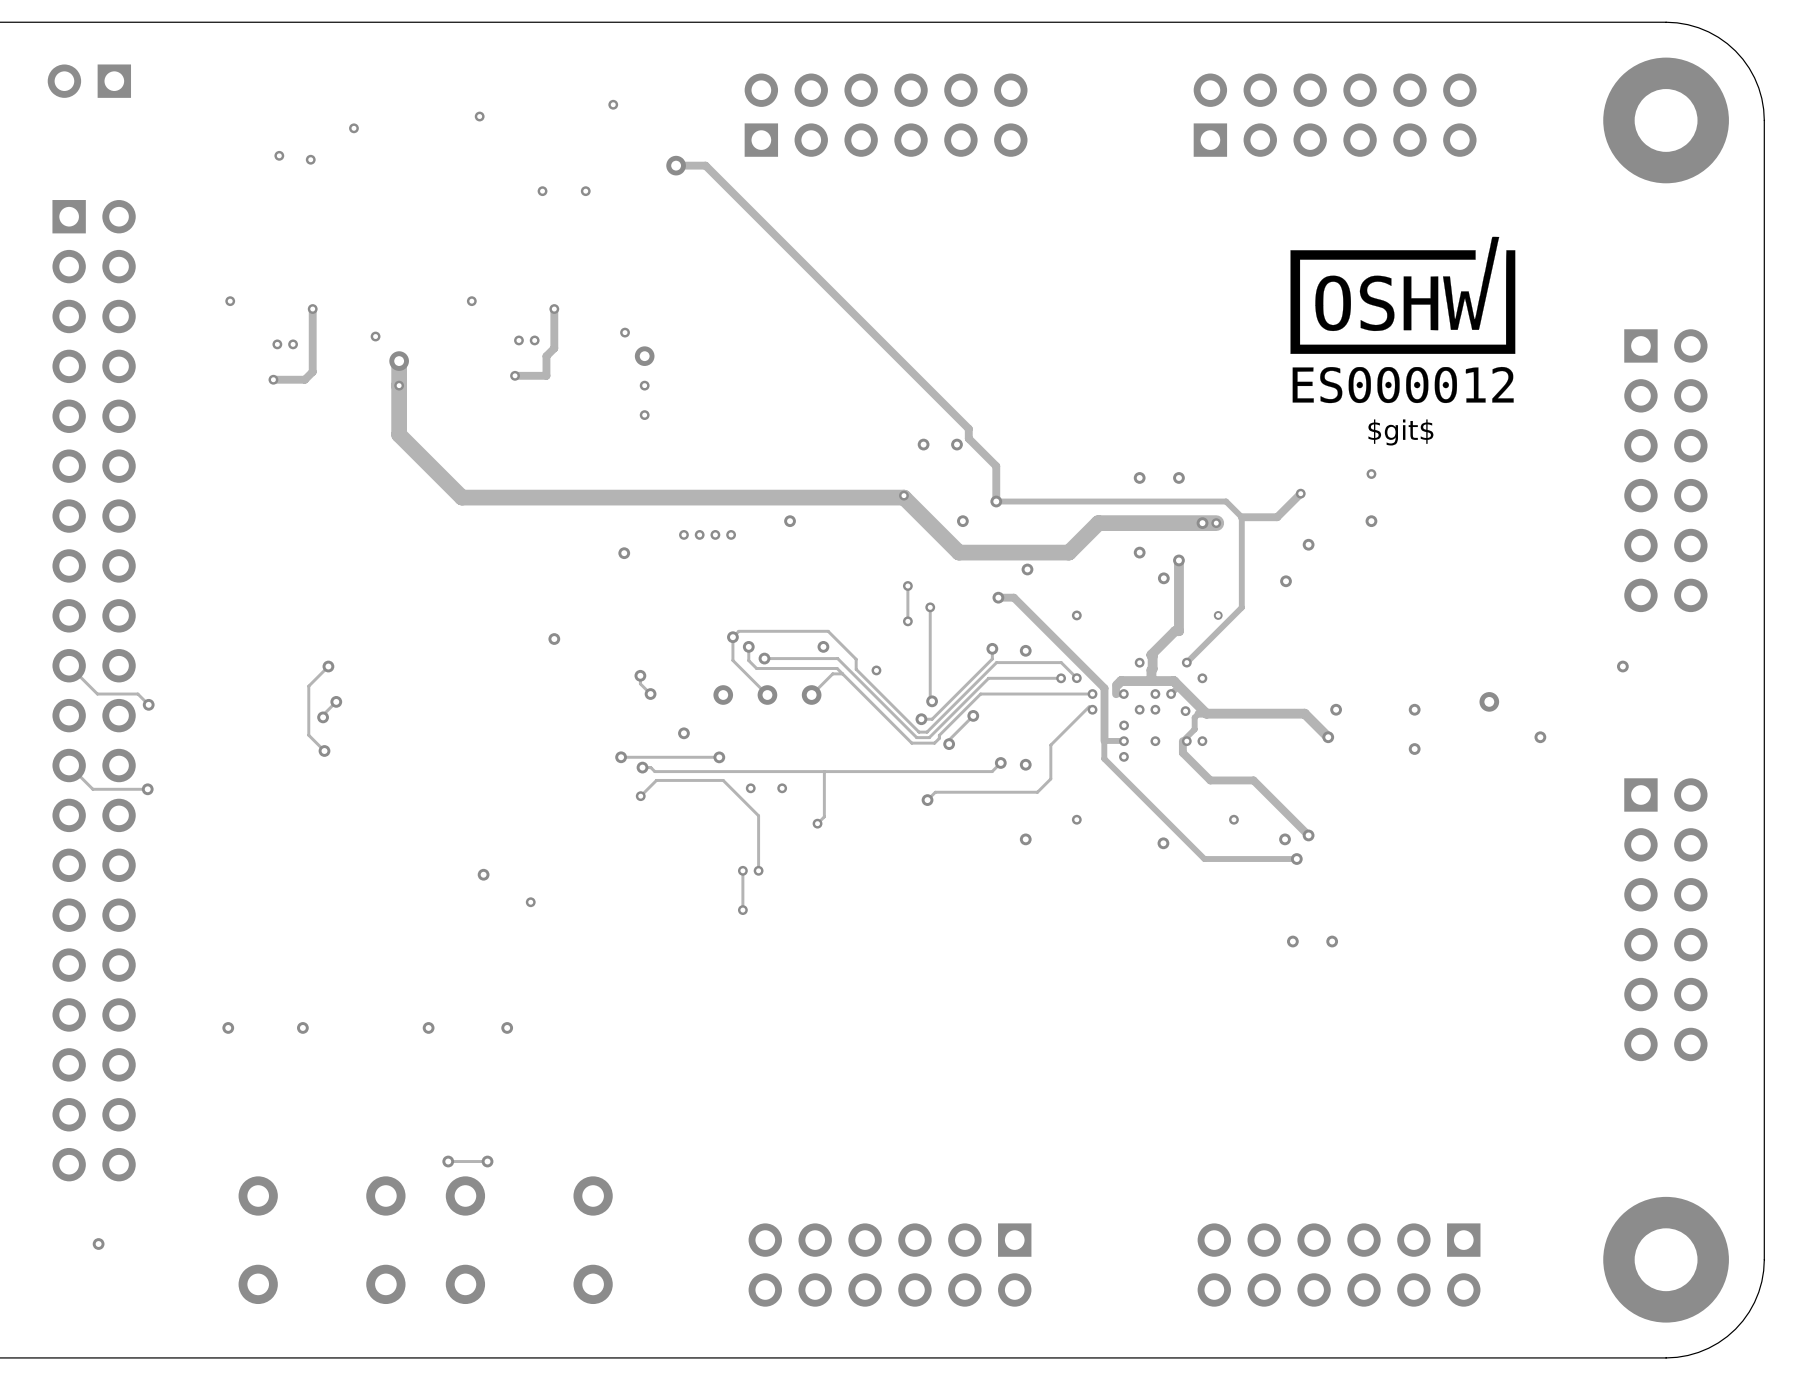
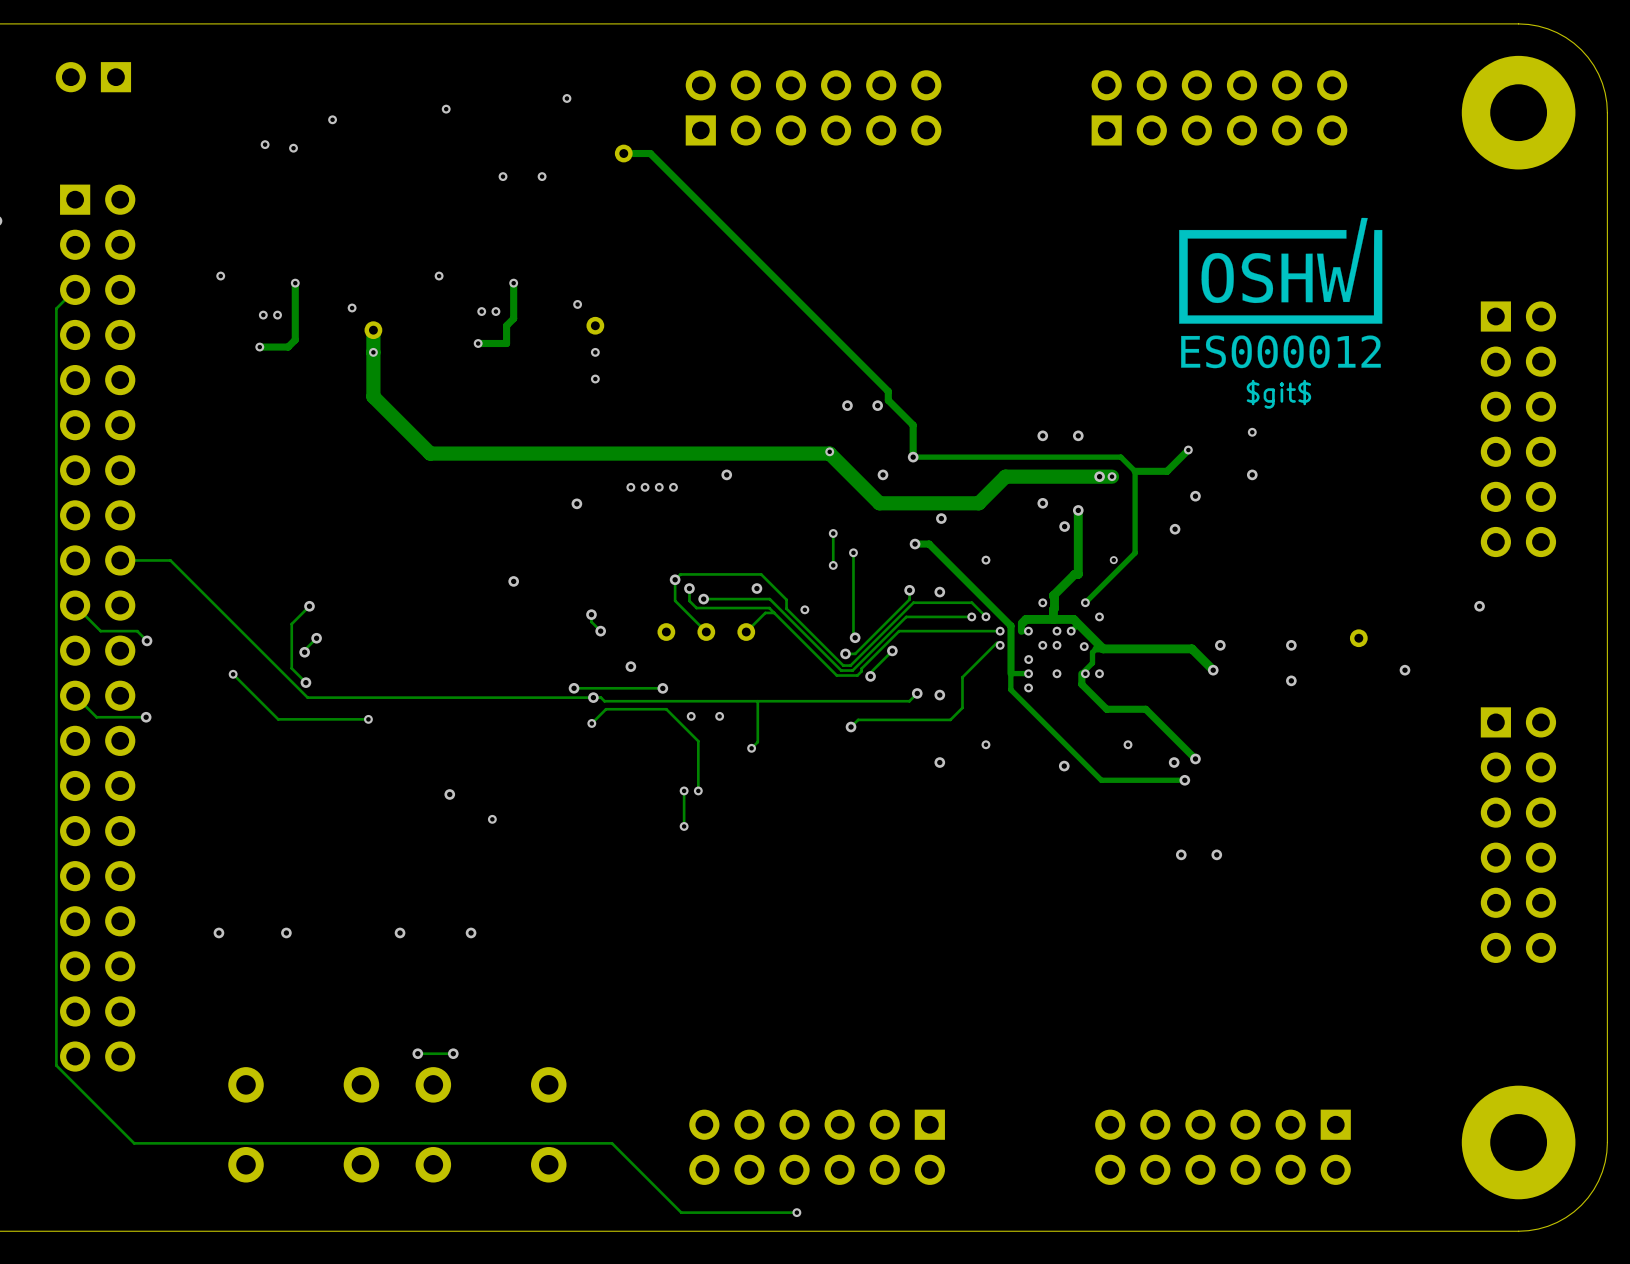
track: none -> (75, 289) (56, 308) (56, 1065) (134, 1143) (612, 1143) (681, 1212) (796, 1212)
track: none -> (120, 560) (170, 560) (307, 697) (593, 697)
track: none -> (233, 674) (278, 719) (368, 719)
via: none -> (233, 674)
via: none -> (368, 719)
via: (98, 1244) -> none
via: none -> (796, 1212)

